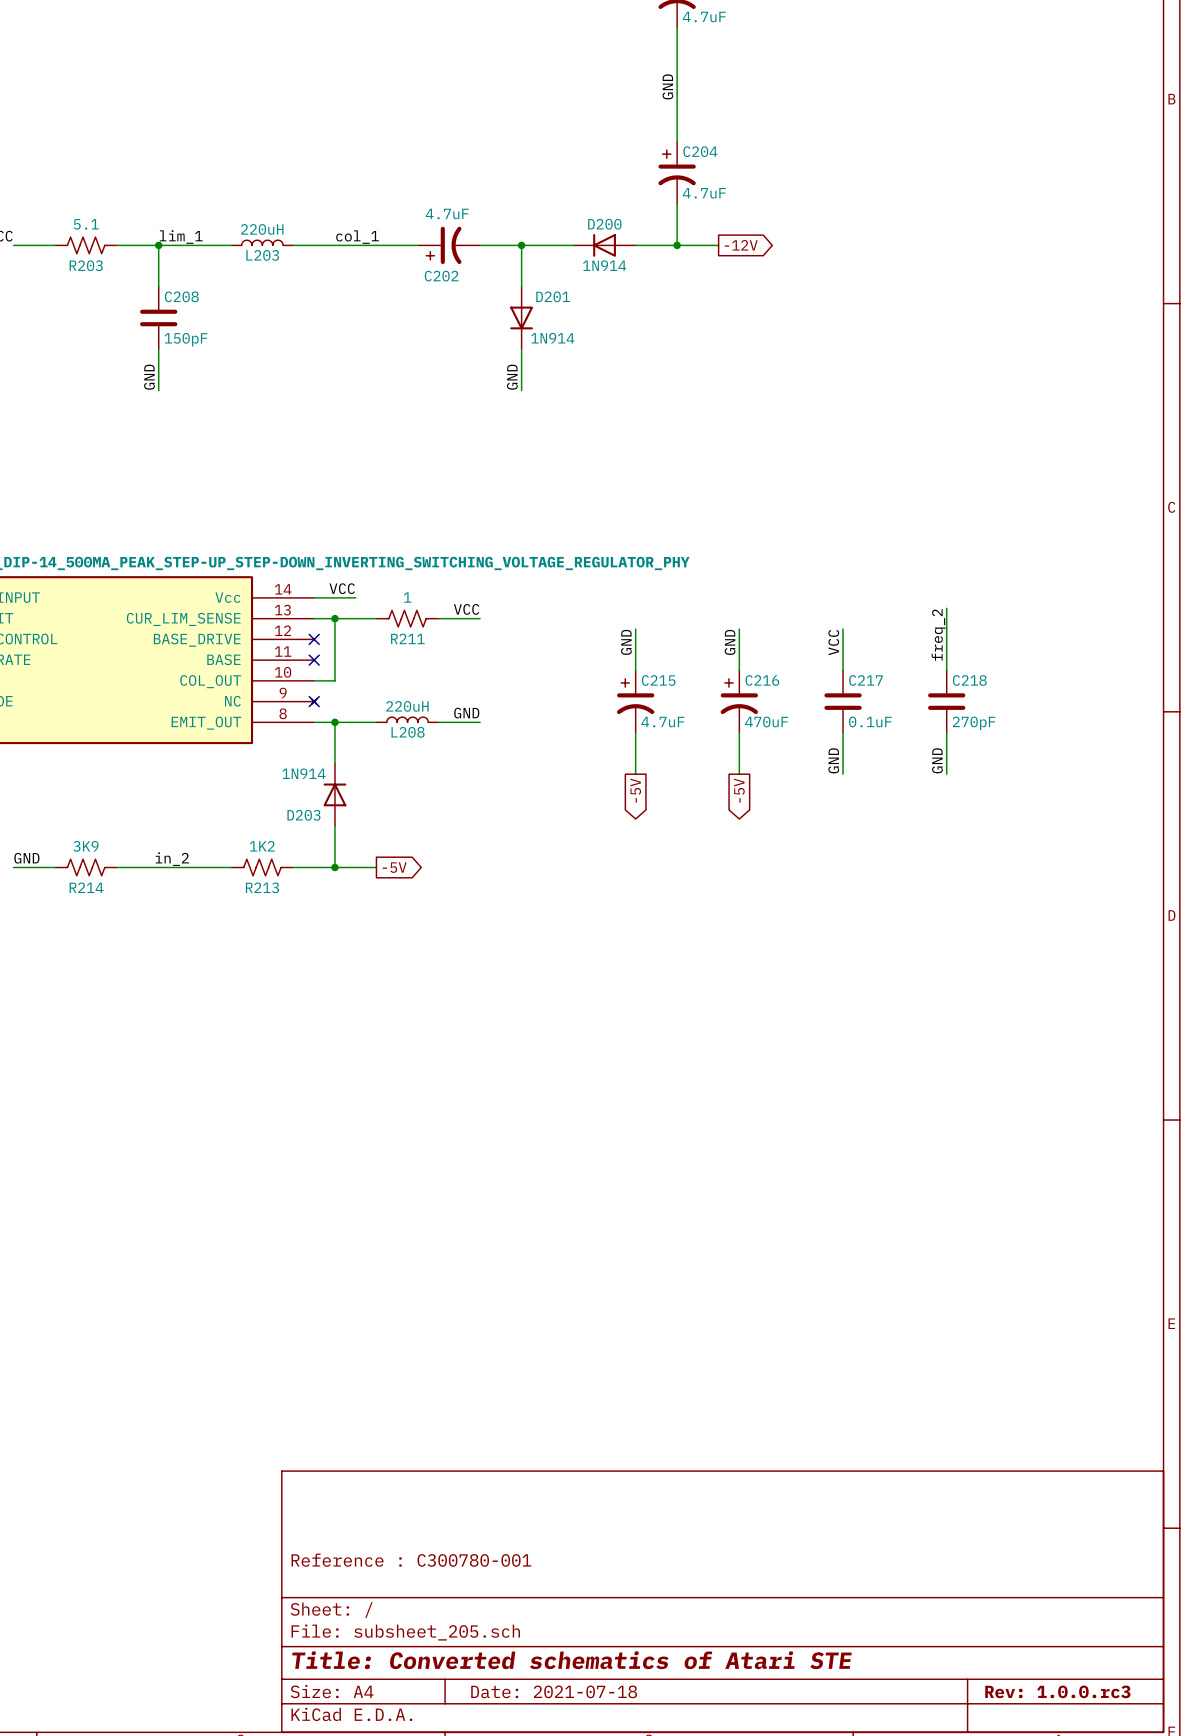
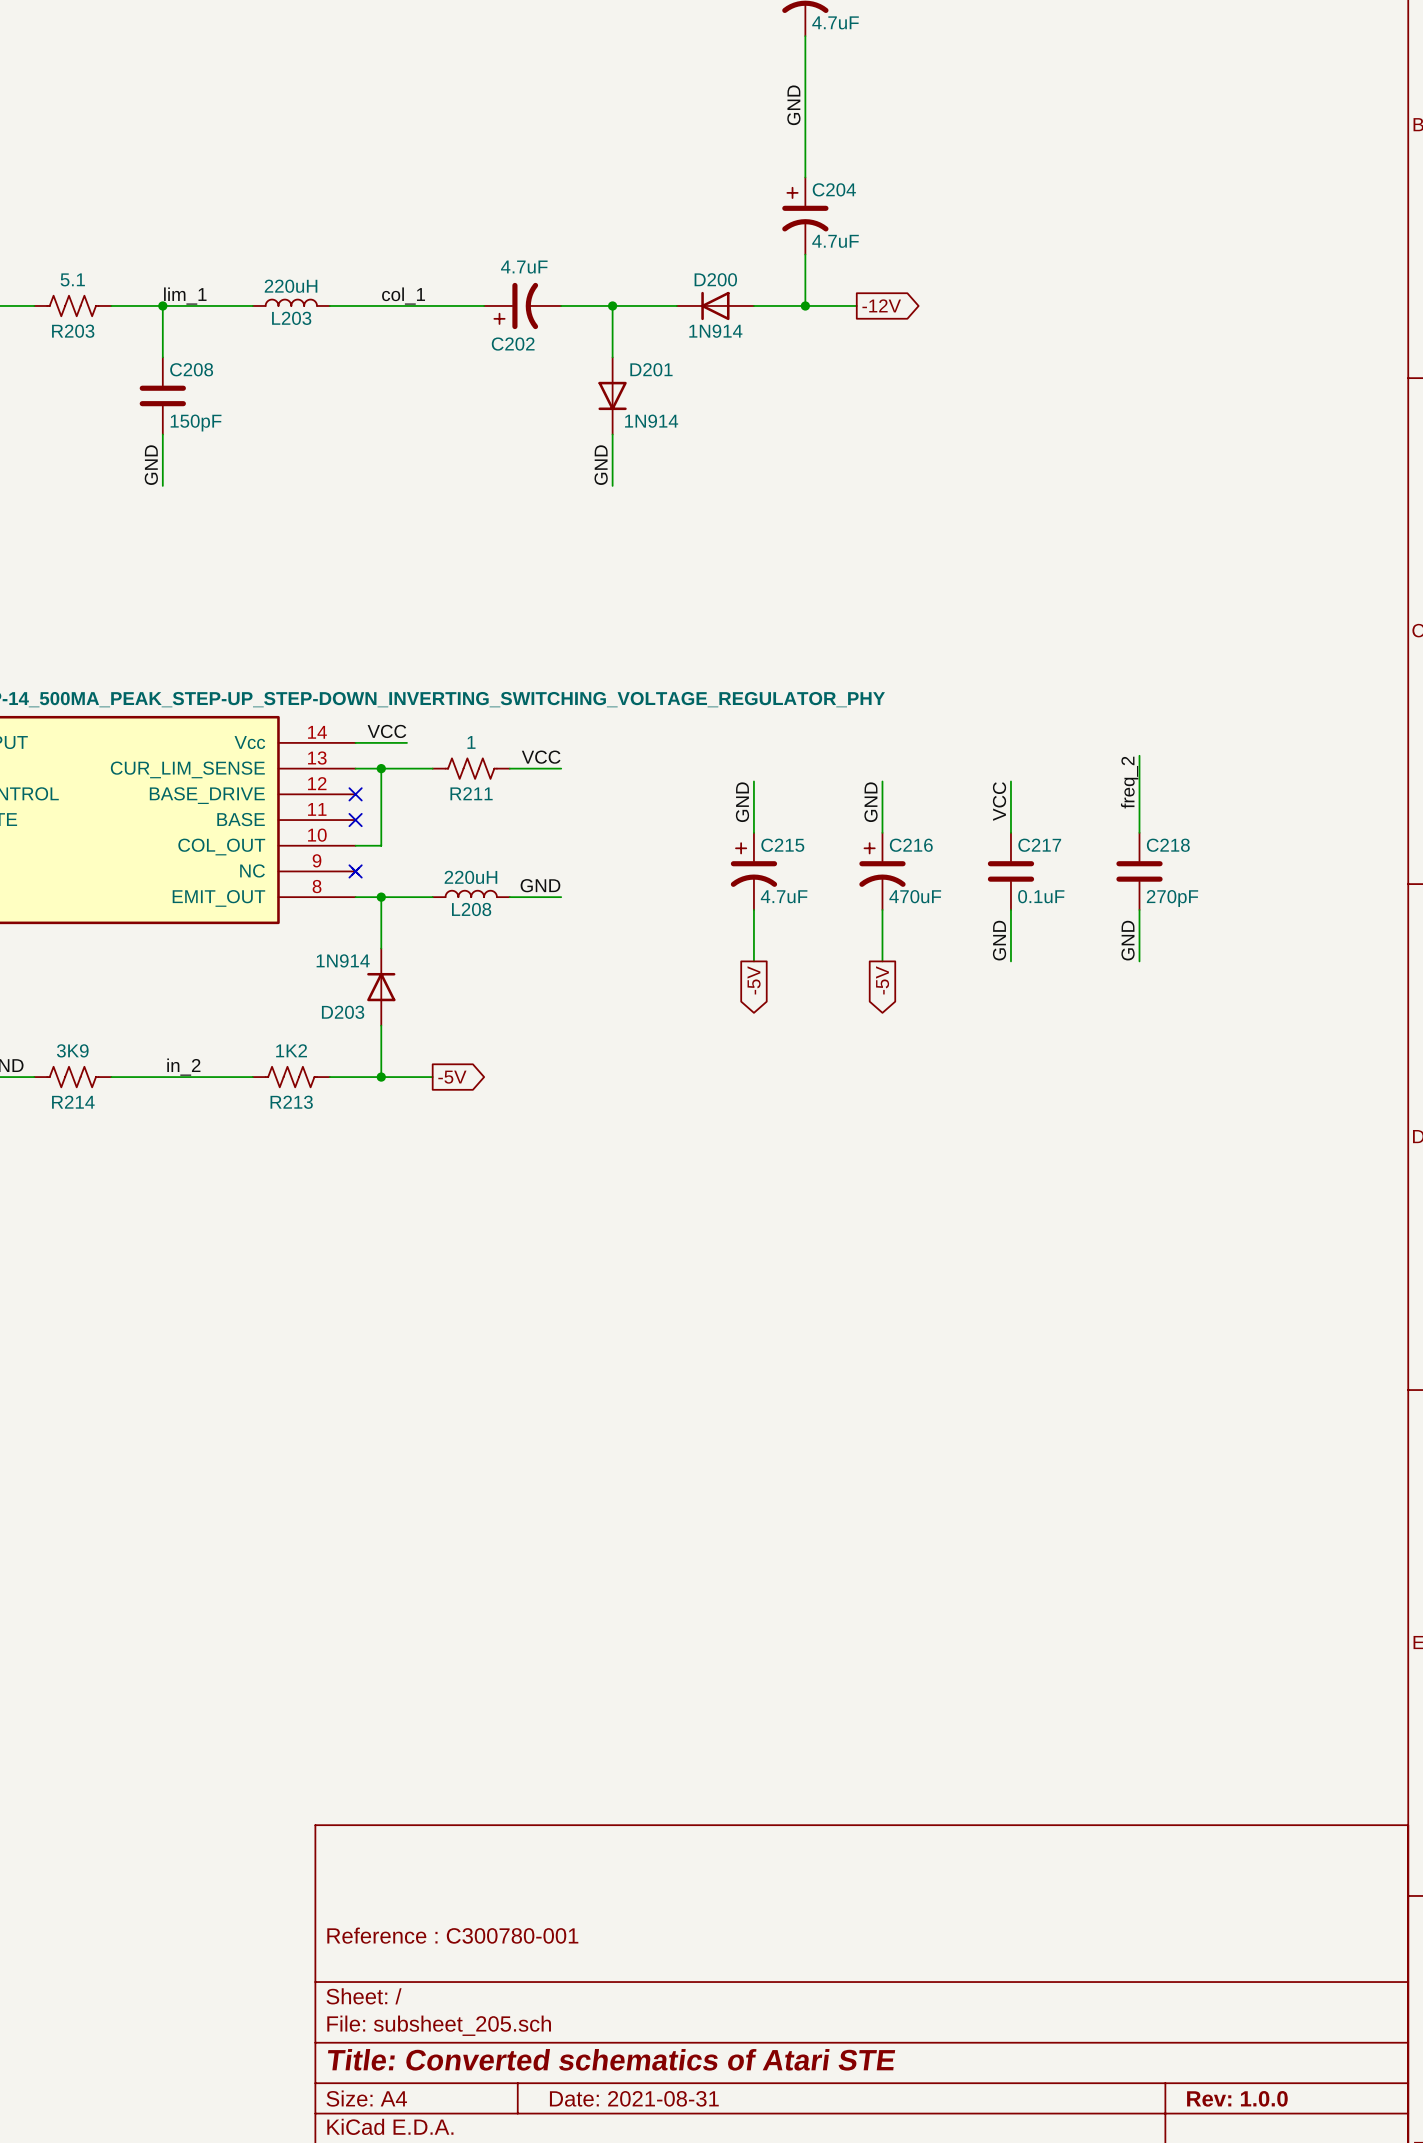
title block: Date: 2021-07-18 (554, 1691) -> Date: 2021-08-31 (634, 2098)
title block: Rev: 1.0.0.rc3 (1057, 1691) -> Rev: 1.0.0 (1237, 2098)

